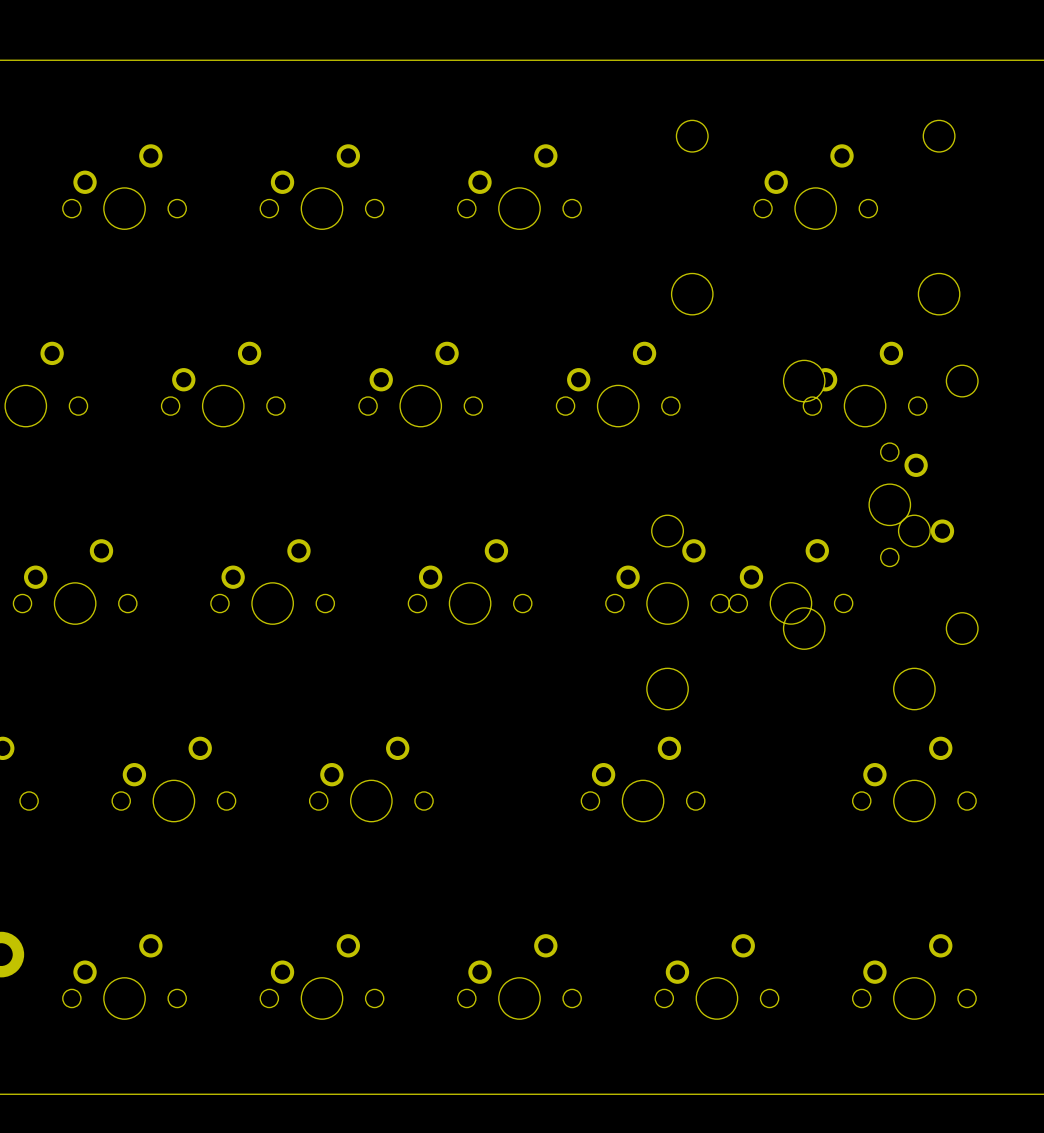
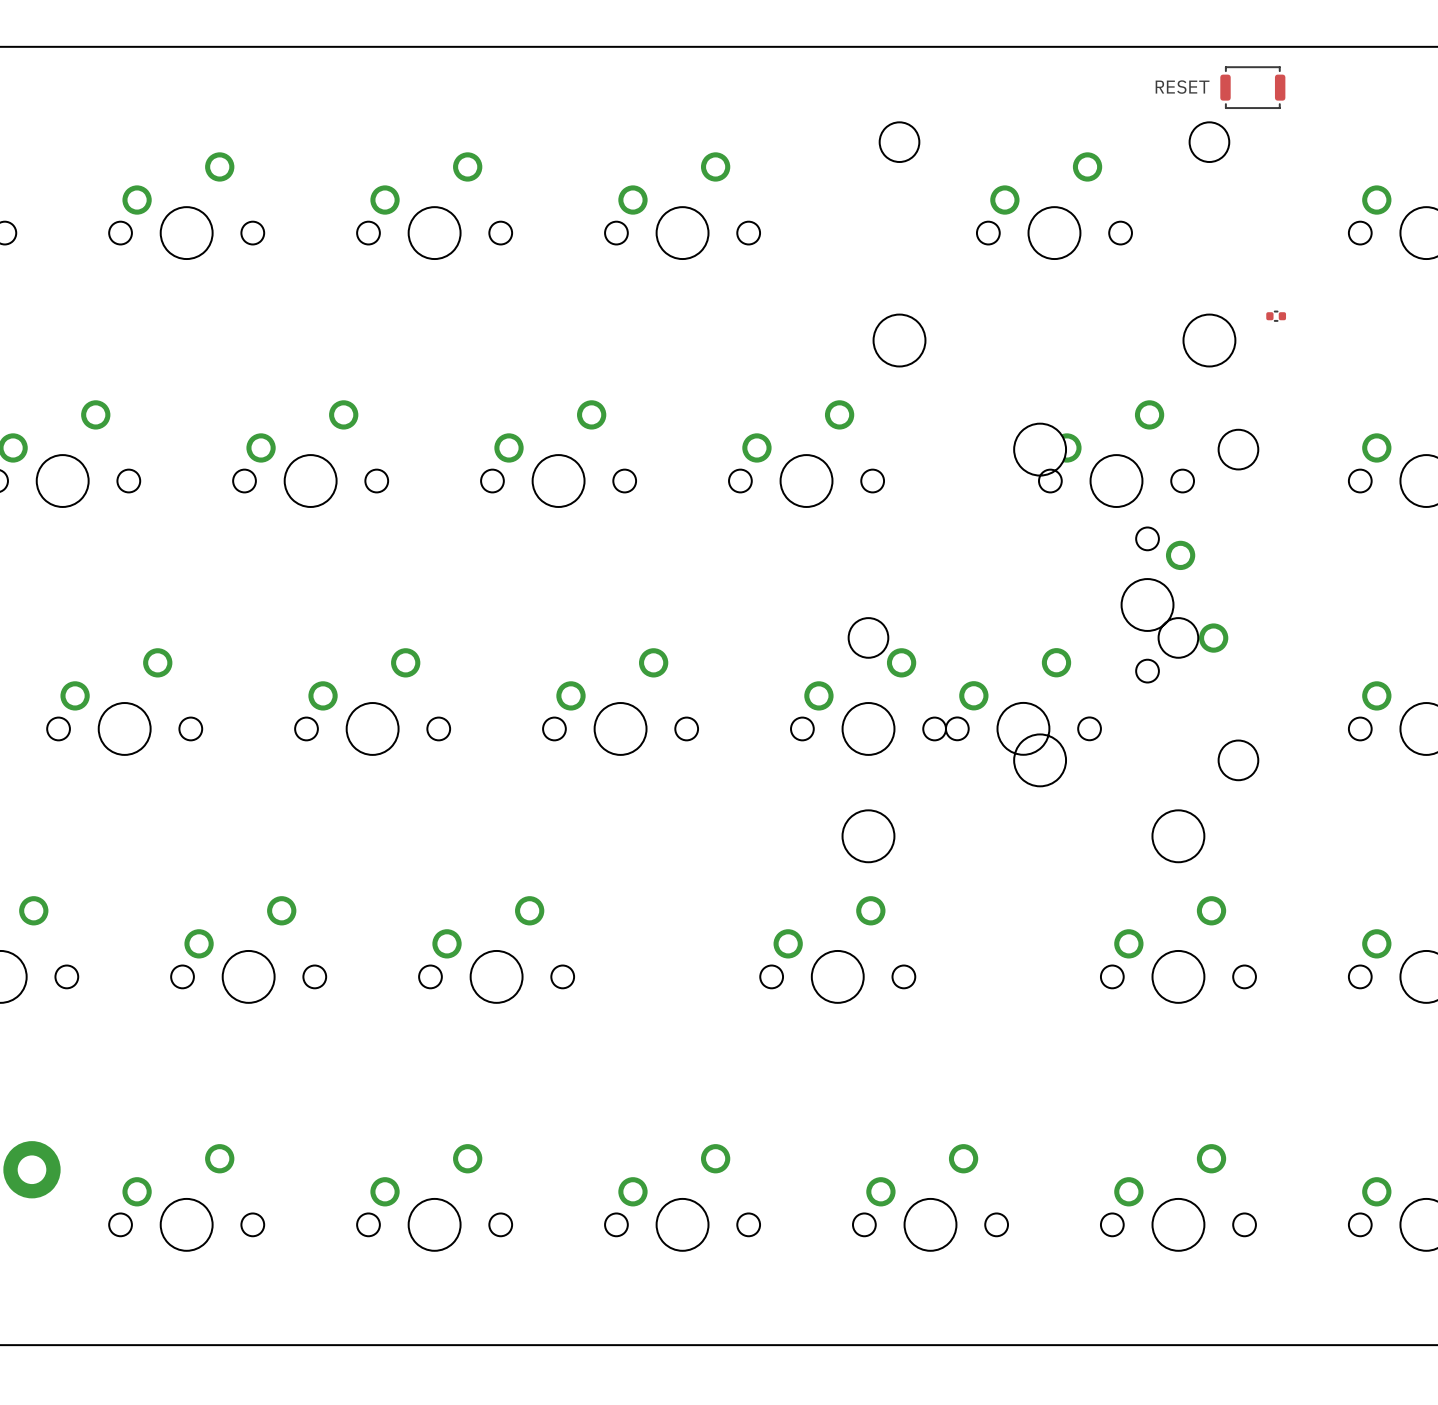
RESET: none -> (1252, 87)
part: none -> (1276, 316)

